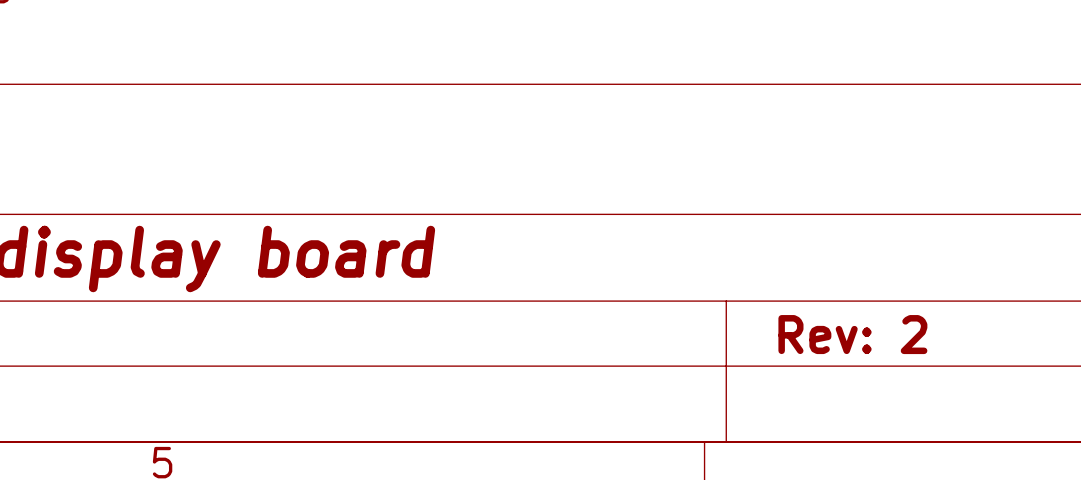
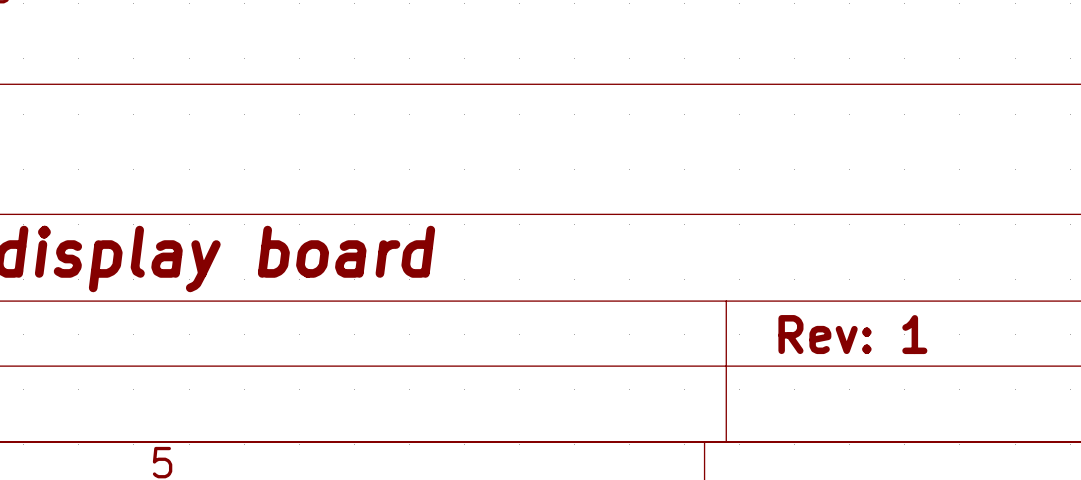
title block: Rev: 2 (852, 334) -> Rev: 1 (852, 334)

